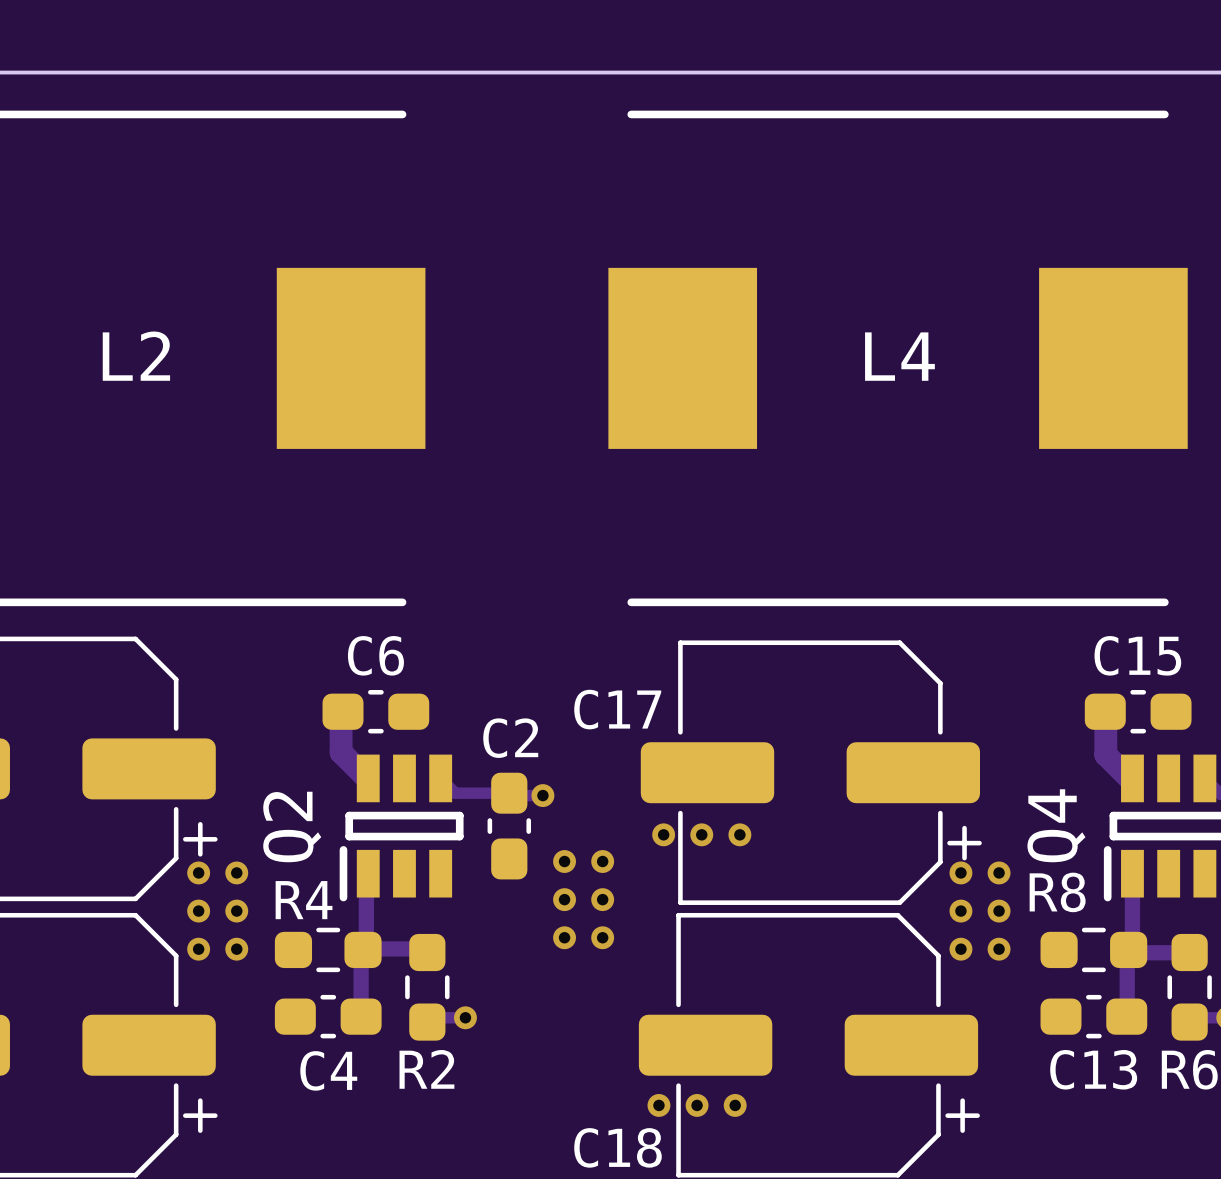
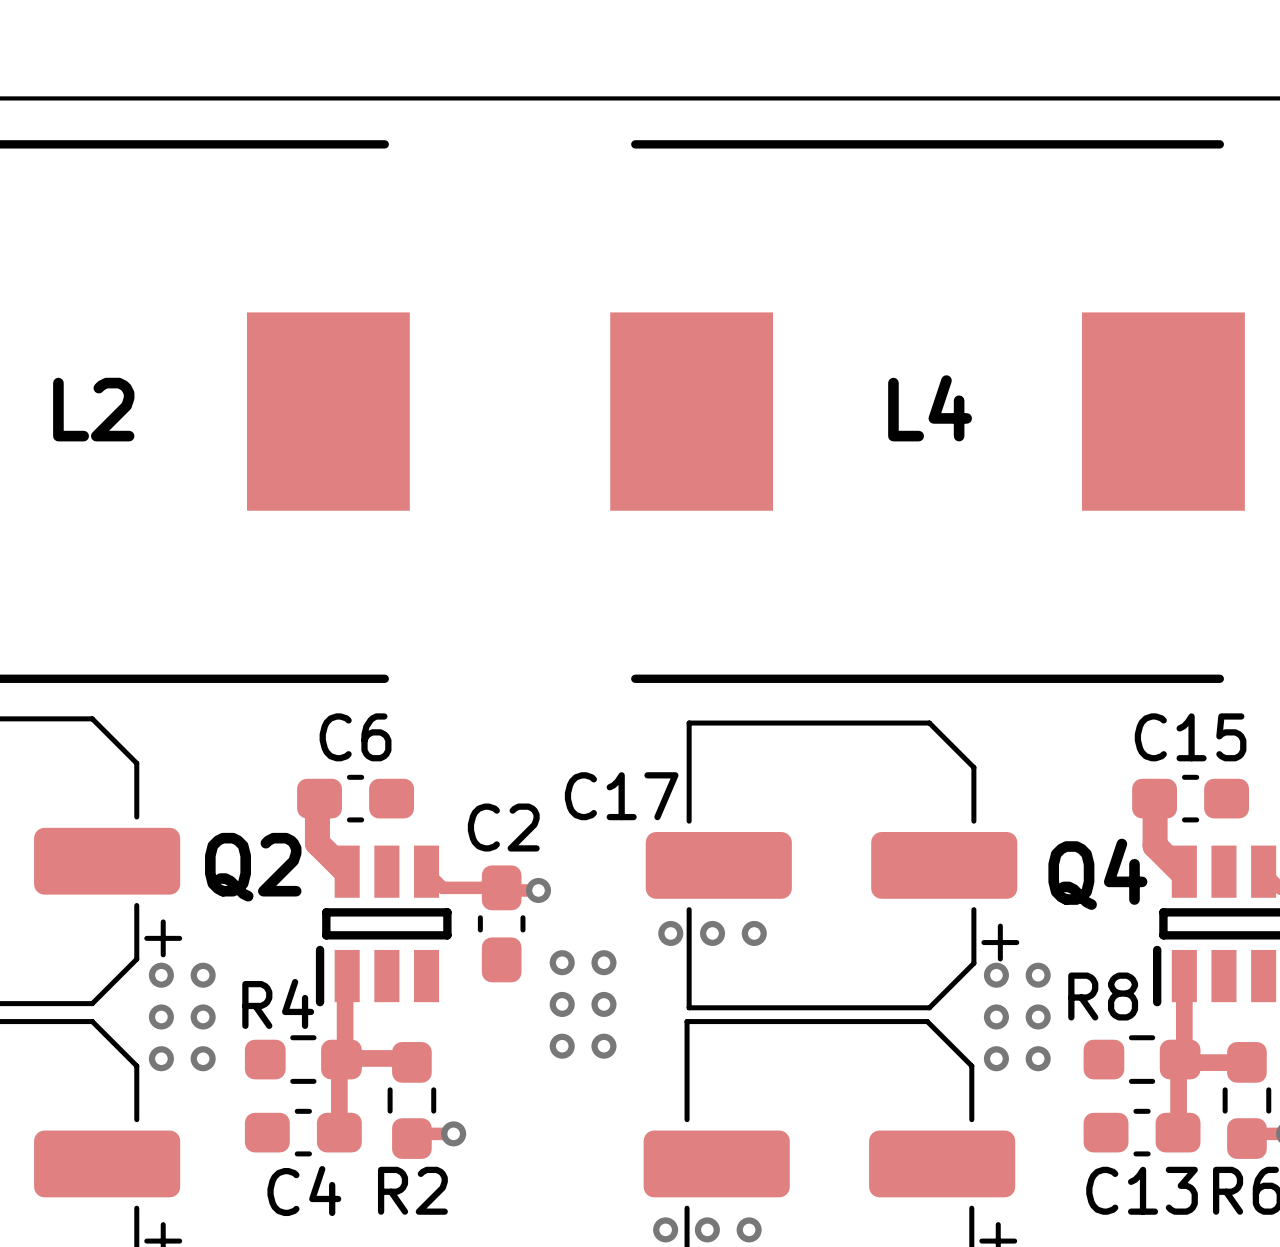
Q4 name rotation: 0° (1056, 825) -> 90° clockwise (1097, 874)
Q2 name rotation: 0° (292, 826) -> 90° clockwise (253, 867)

